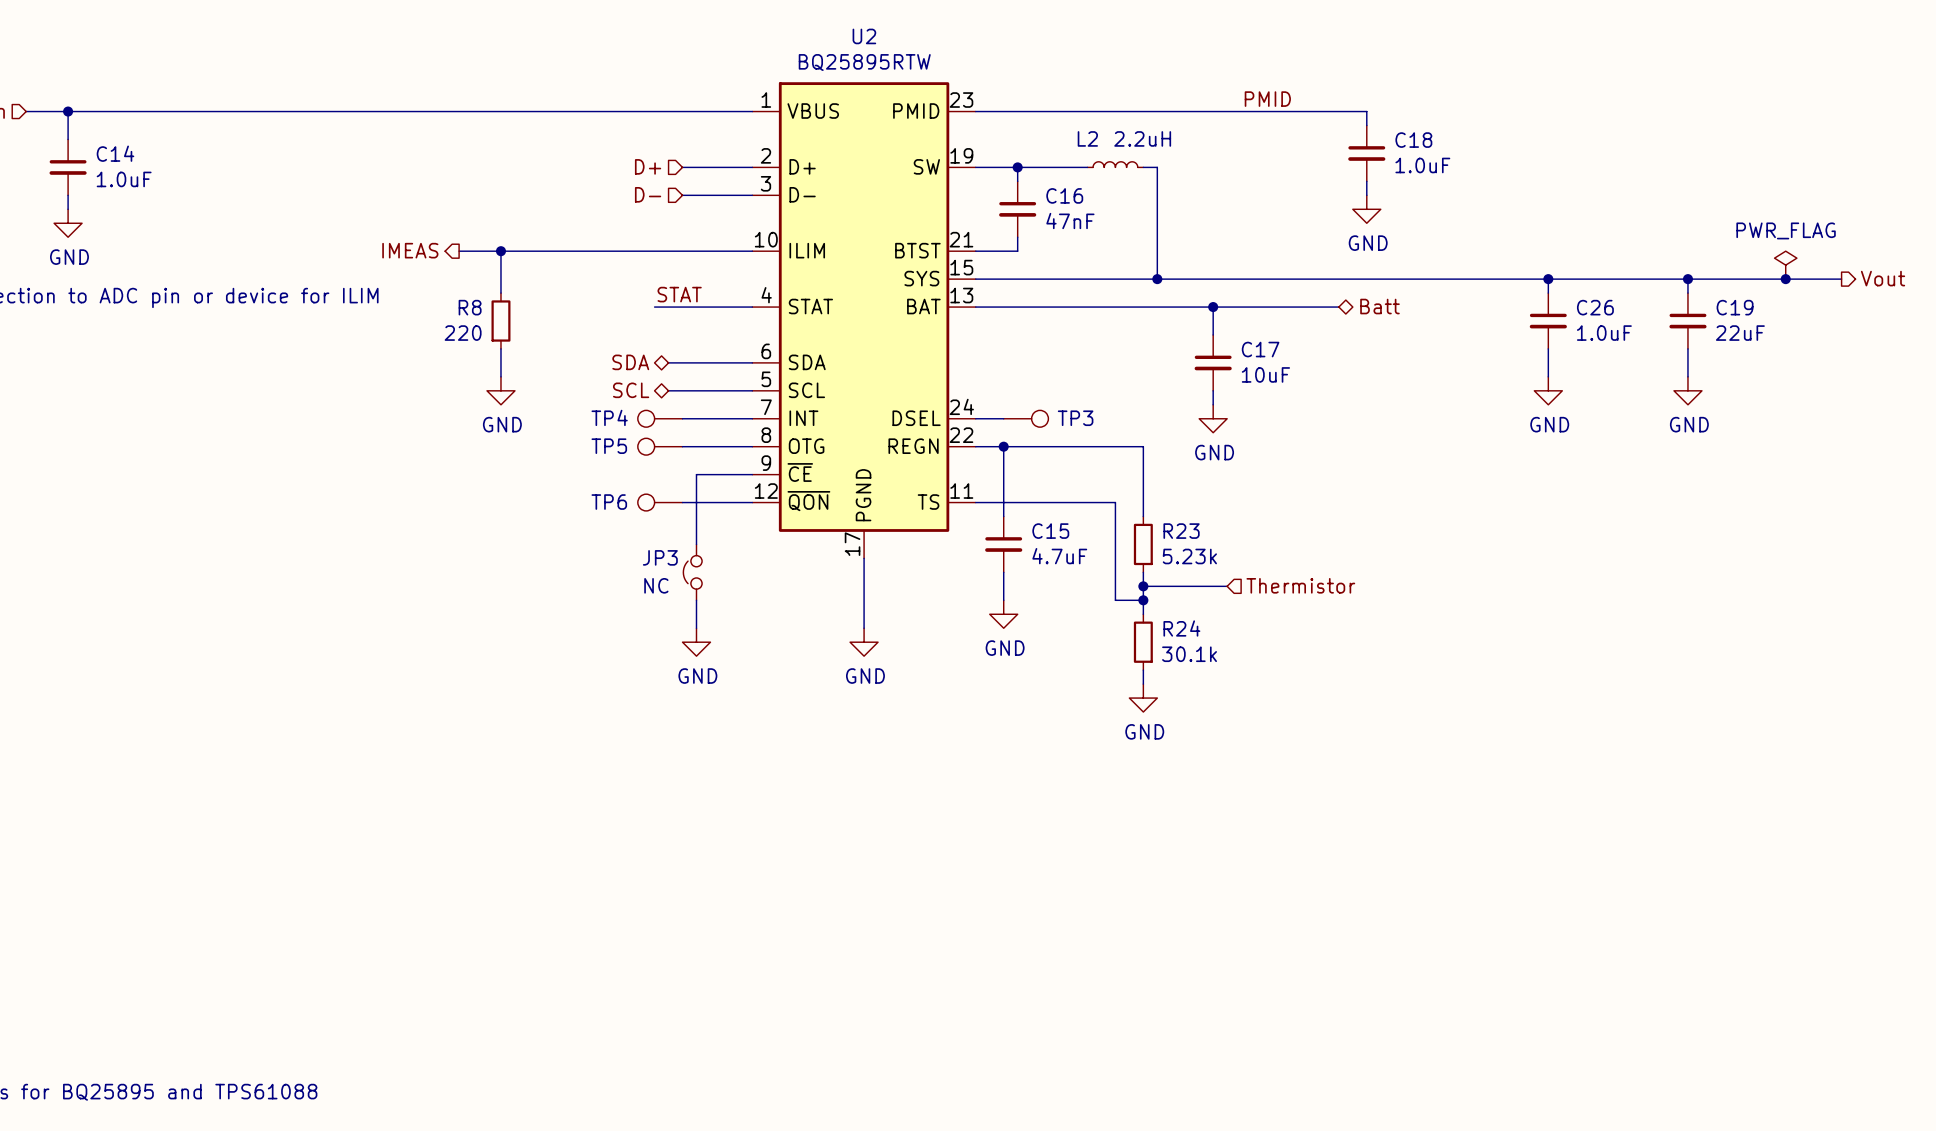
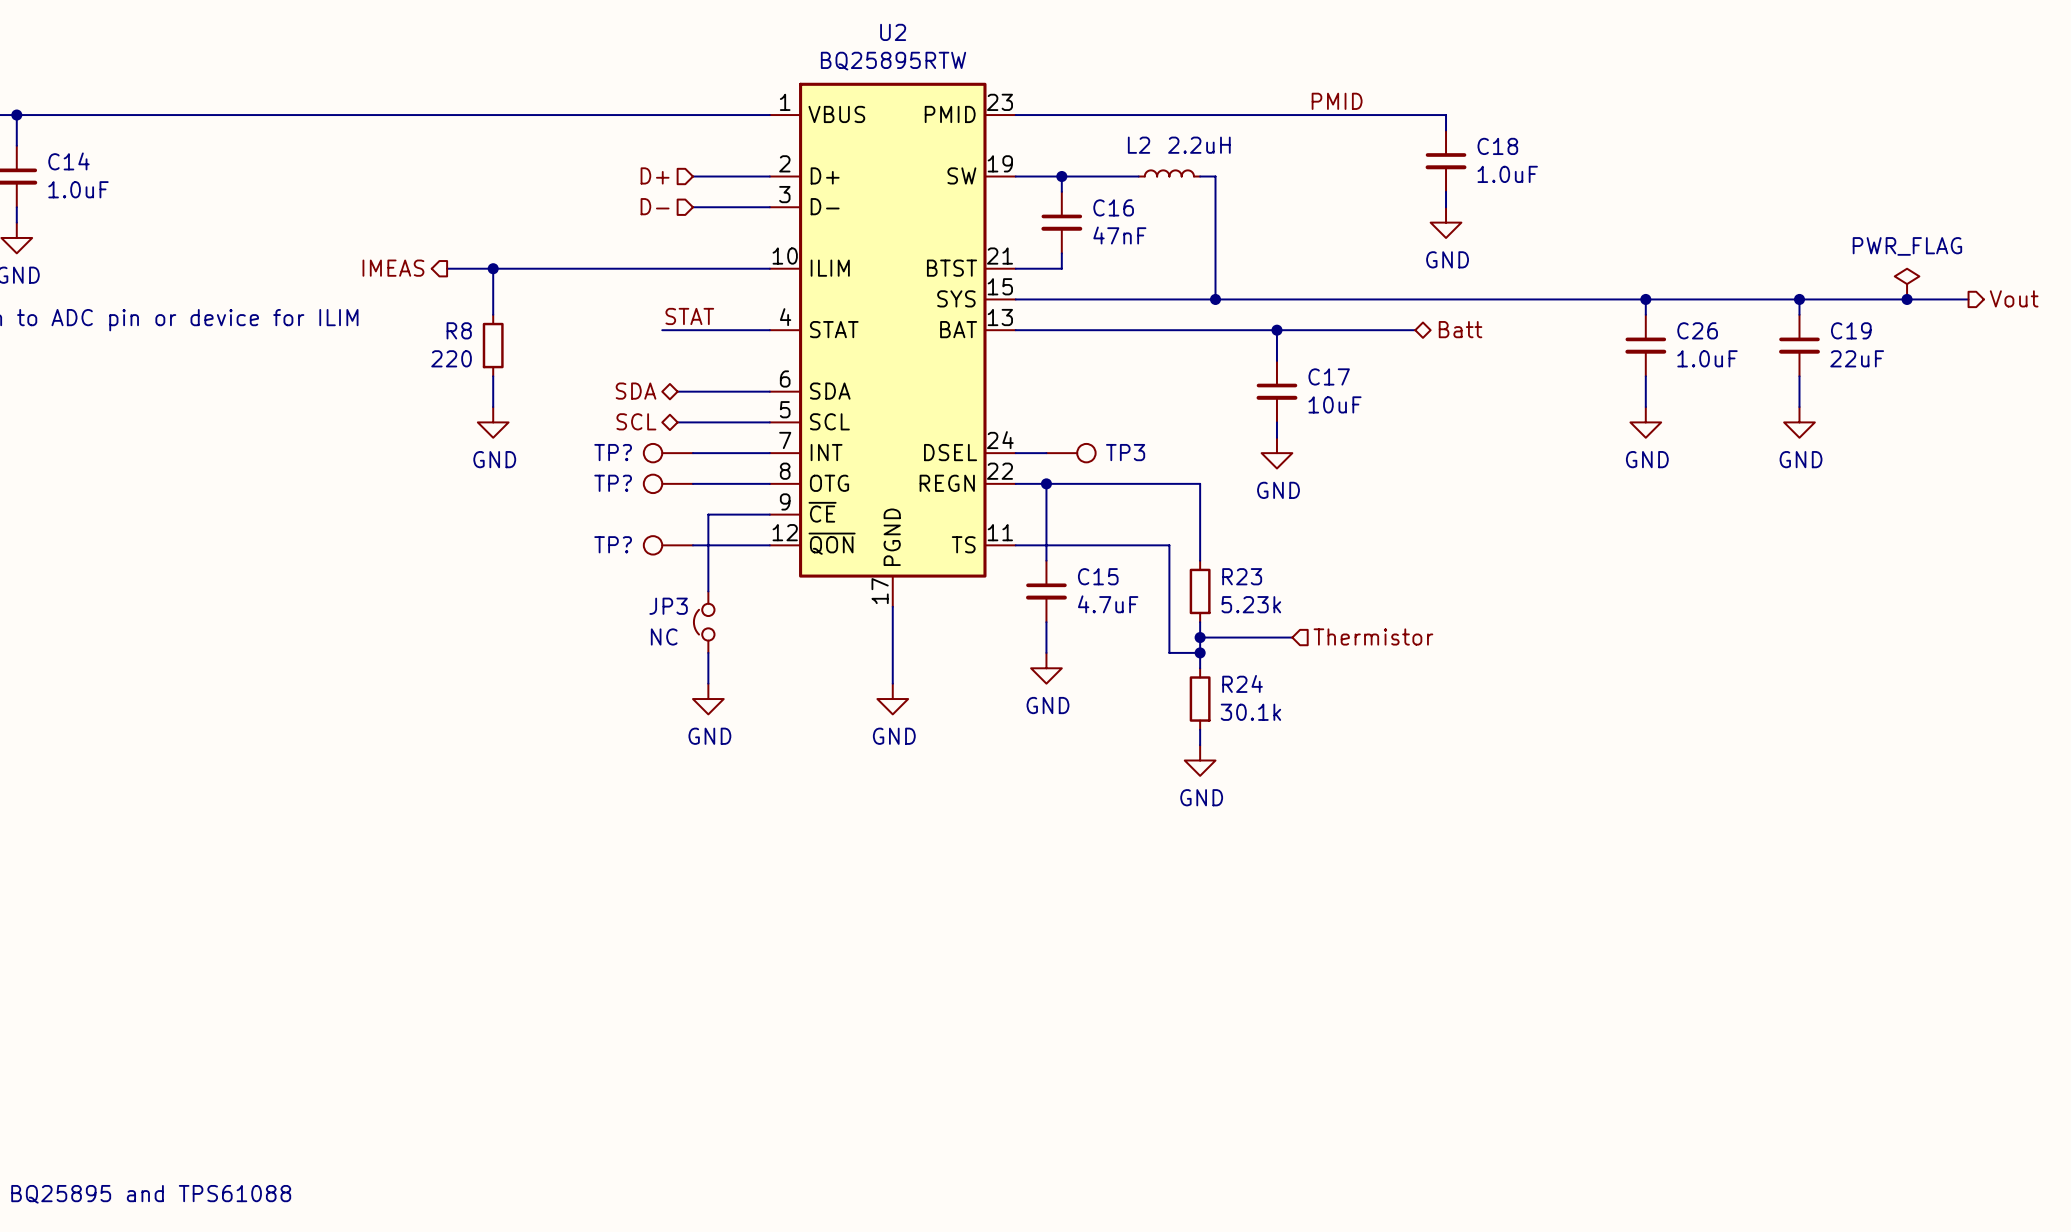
TP4 name: TP4 (609, 417) -> TP? (613, 452)
TP5 name: TP5 (609, 446) -> TP? (613, 483)
TP6 name: TP6 (609, 502) -> TP? (613, 544)

